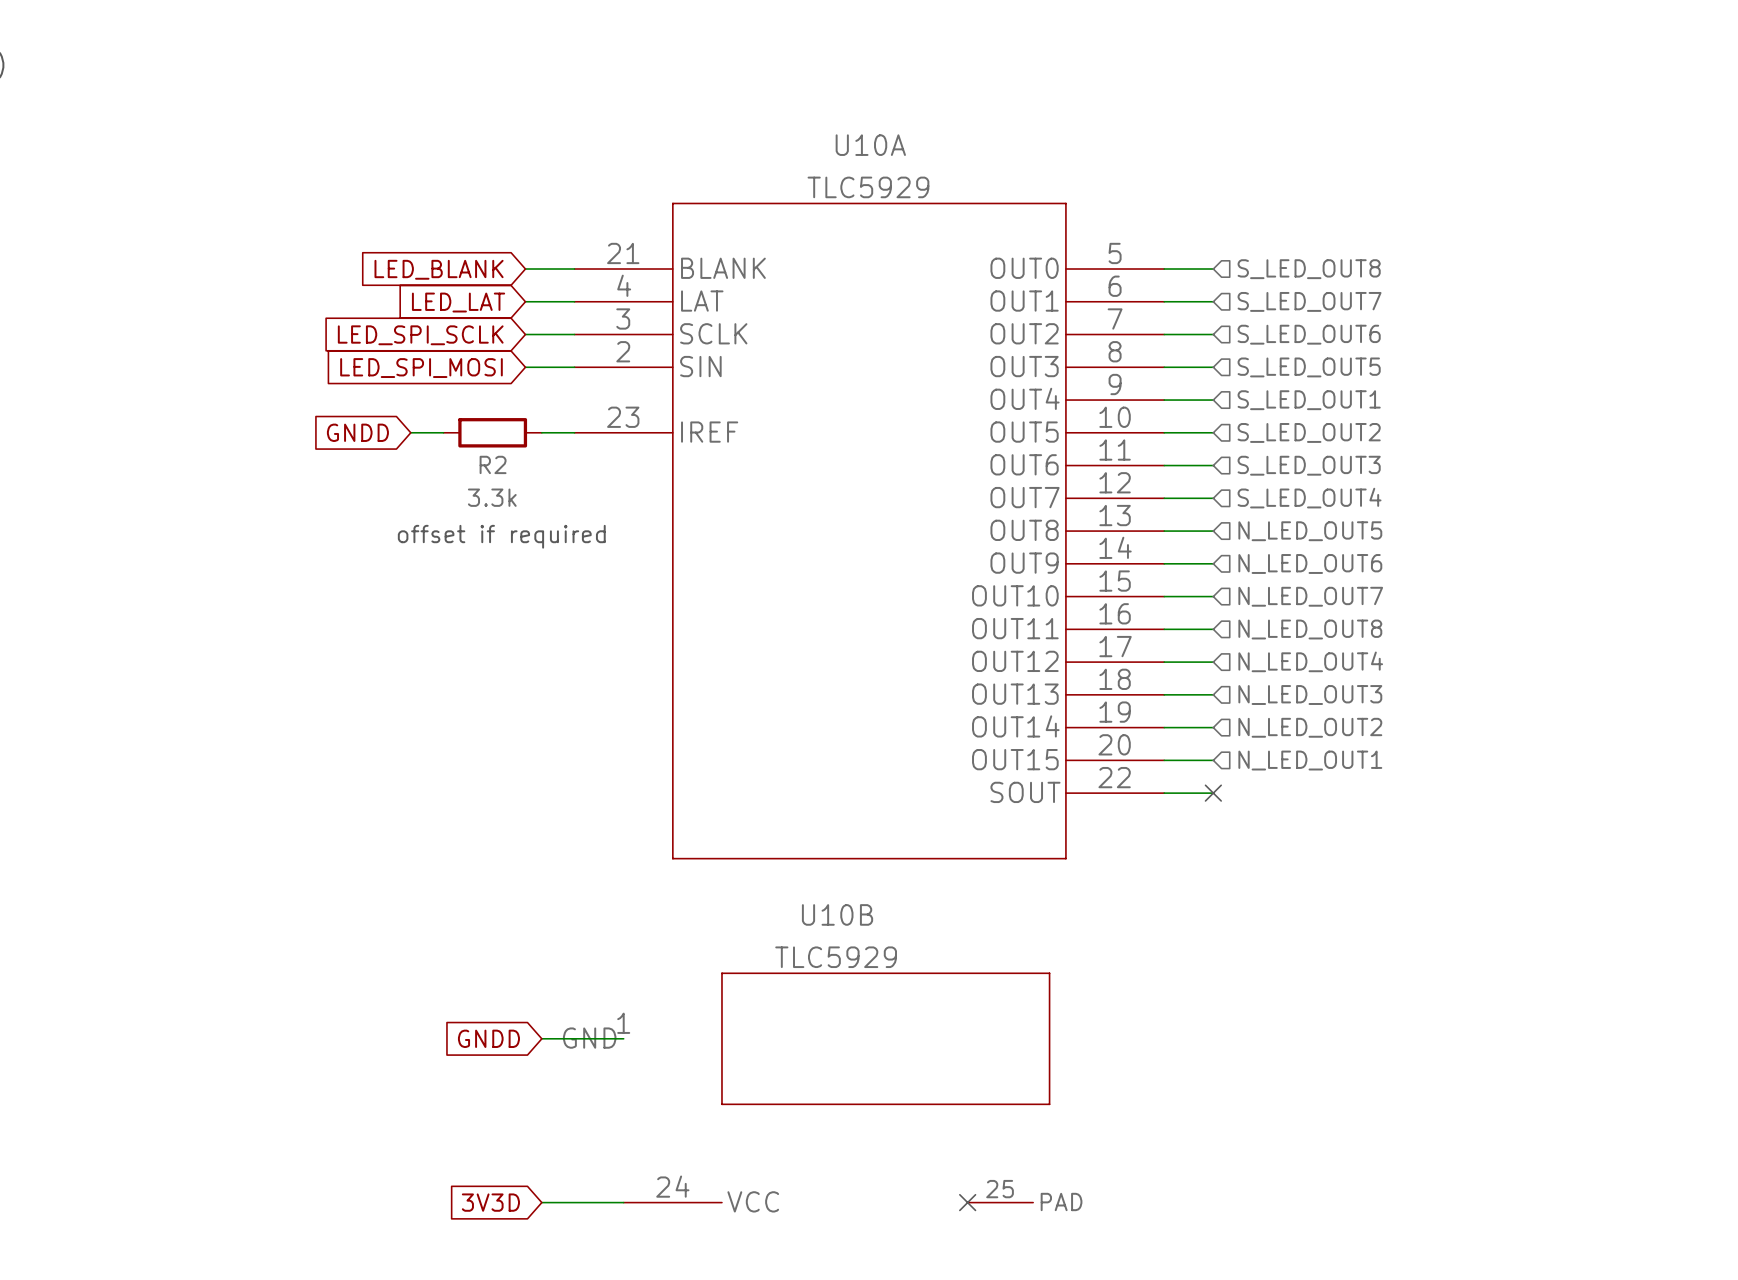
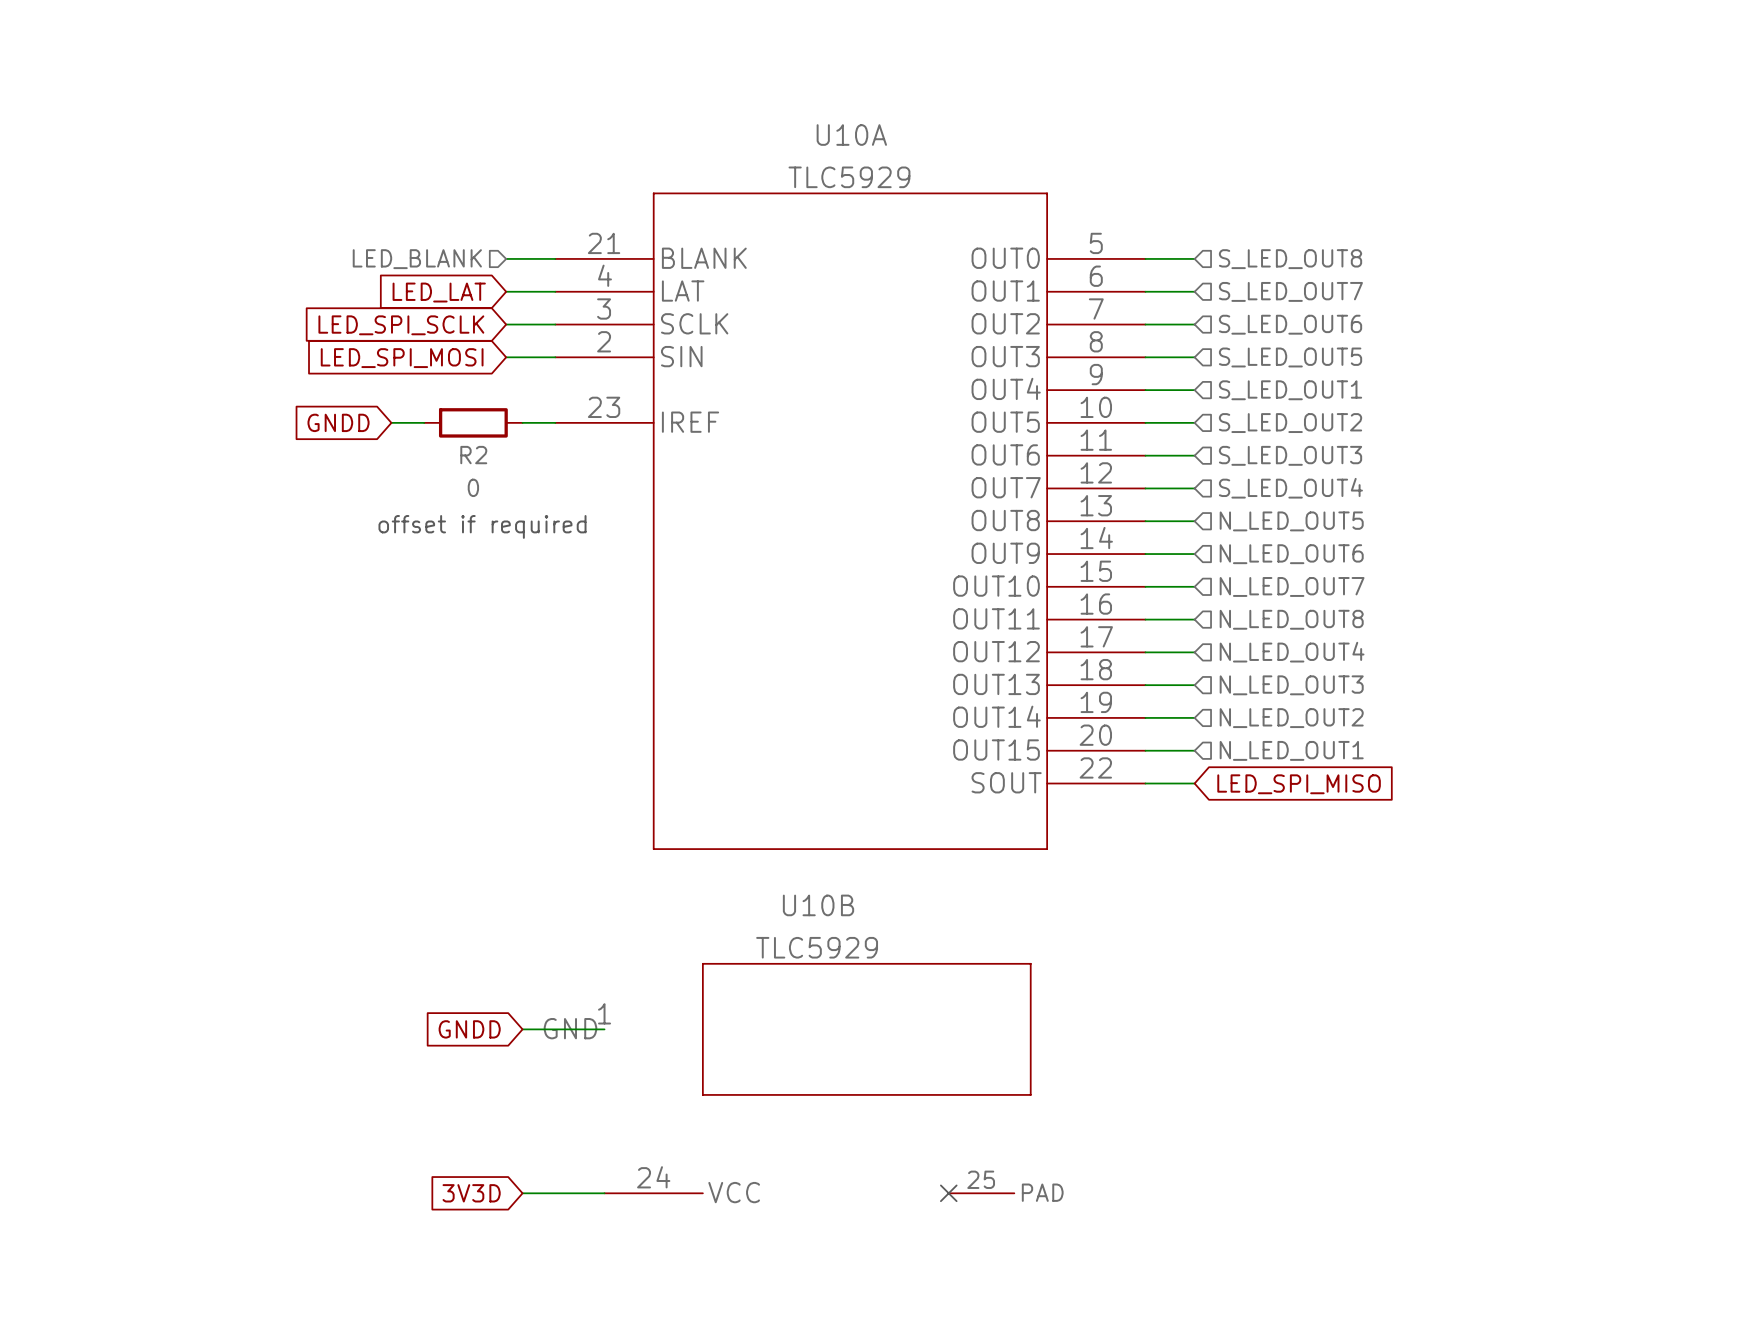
hierarchical label: none -> LED_BLANK (417, 259)
global label: LED_BLANK (439, 269) -> none
R2 value: 3.3k (492, 497) -> 0 (473, 487)
no-connect mark: (1213, 793) -> none
global label: none -> LED_SPI_MISO (1299, 784)

